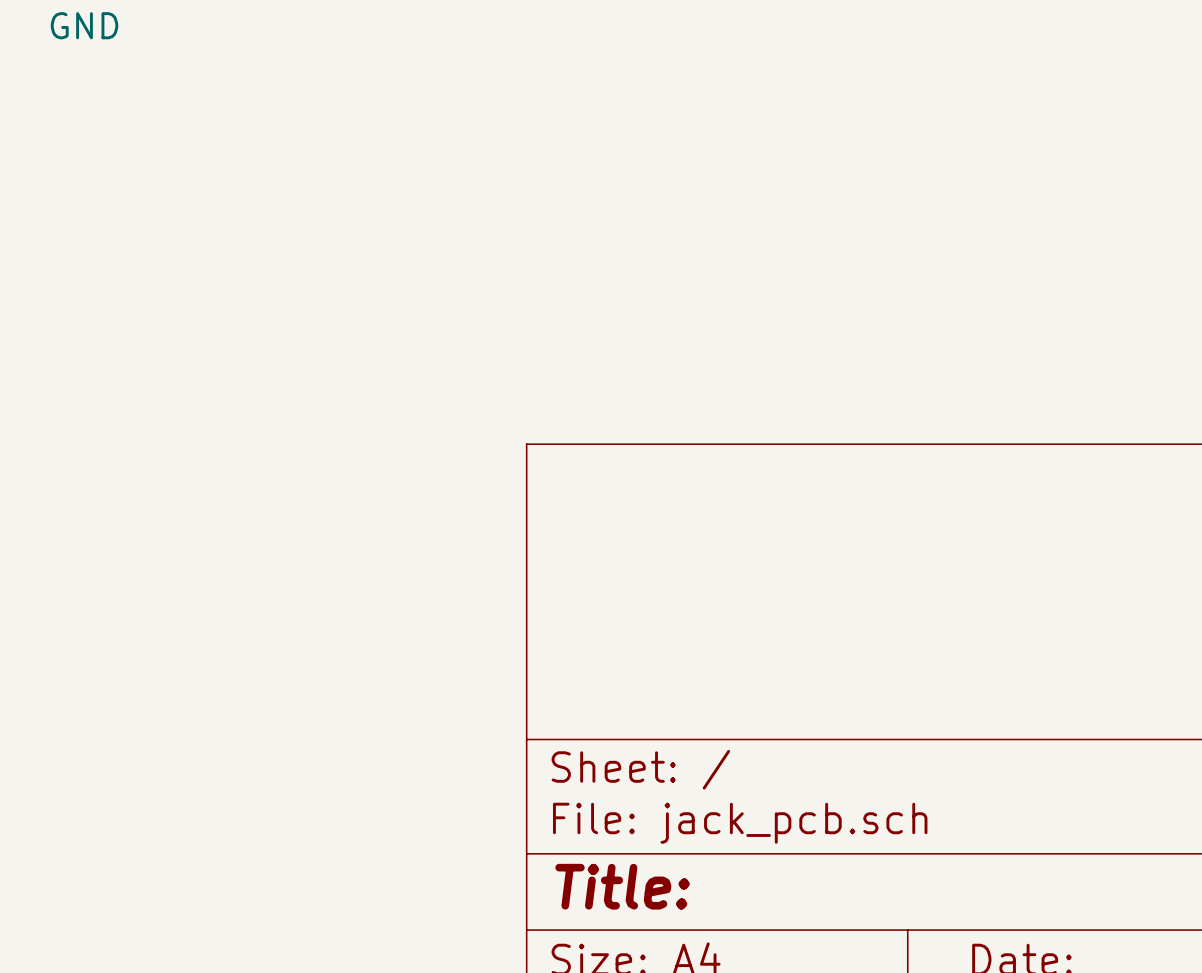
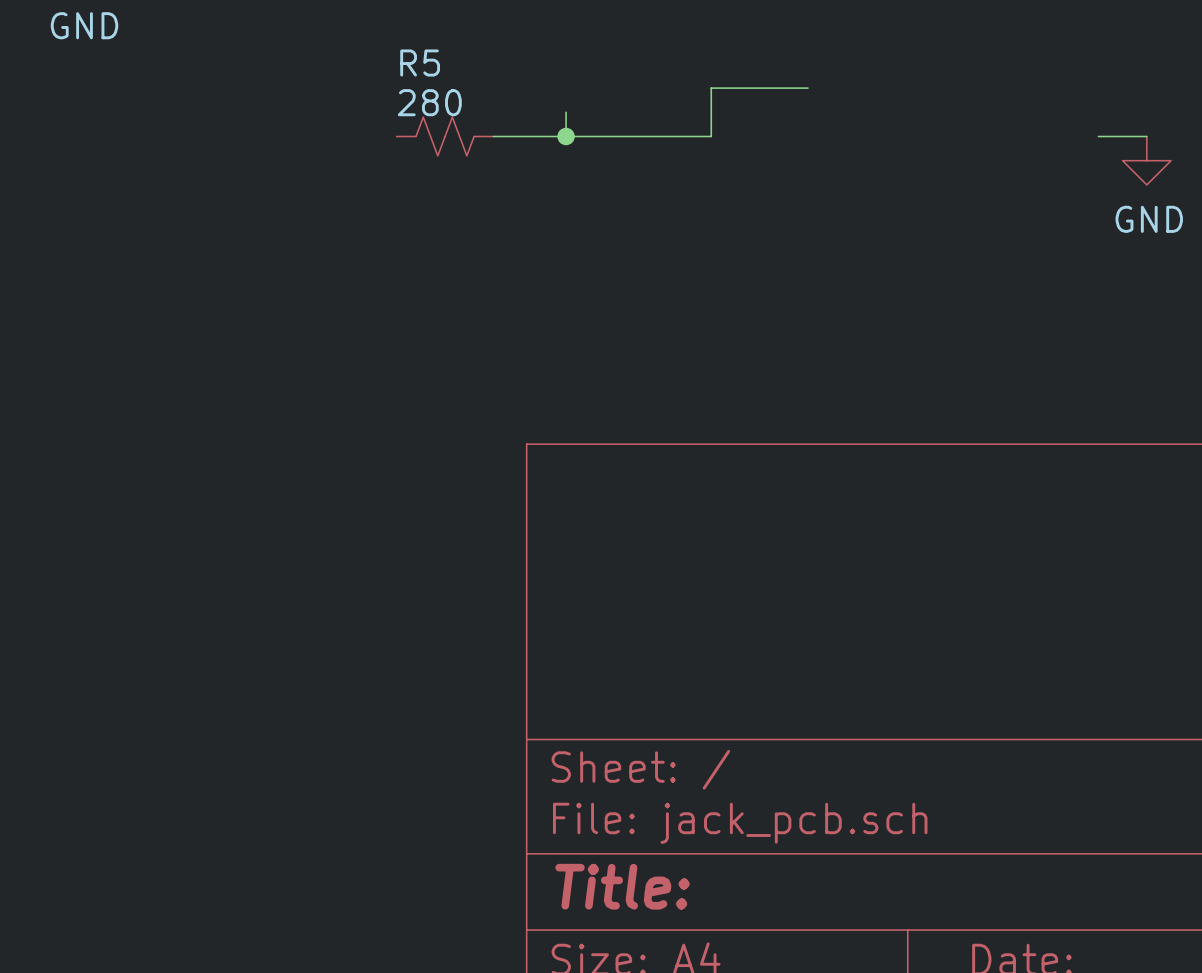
wire: none -> (808, 88) (711, 88) (711, 136) (493, 136)
wire: none -> (566, 112) (566, 136)
R5: none -> 280 (445, 136)
junction: none -> (566, 136)
wire: none -> (1098, 136) (1146, 136)
power symbol: none -> GND (1146, 160)

